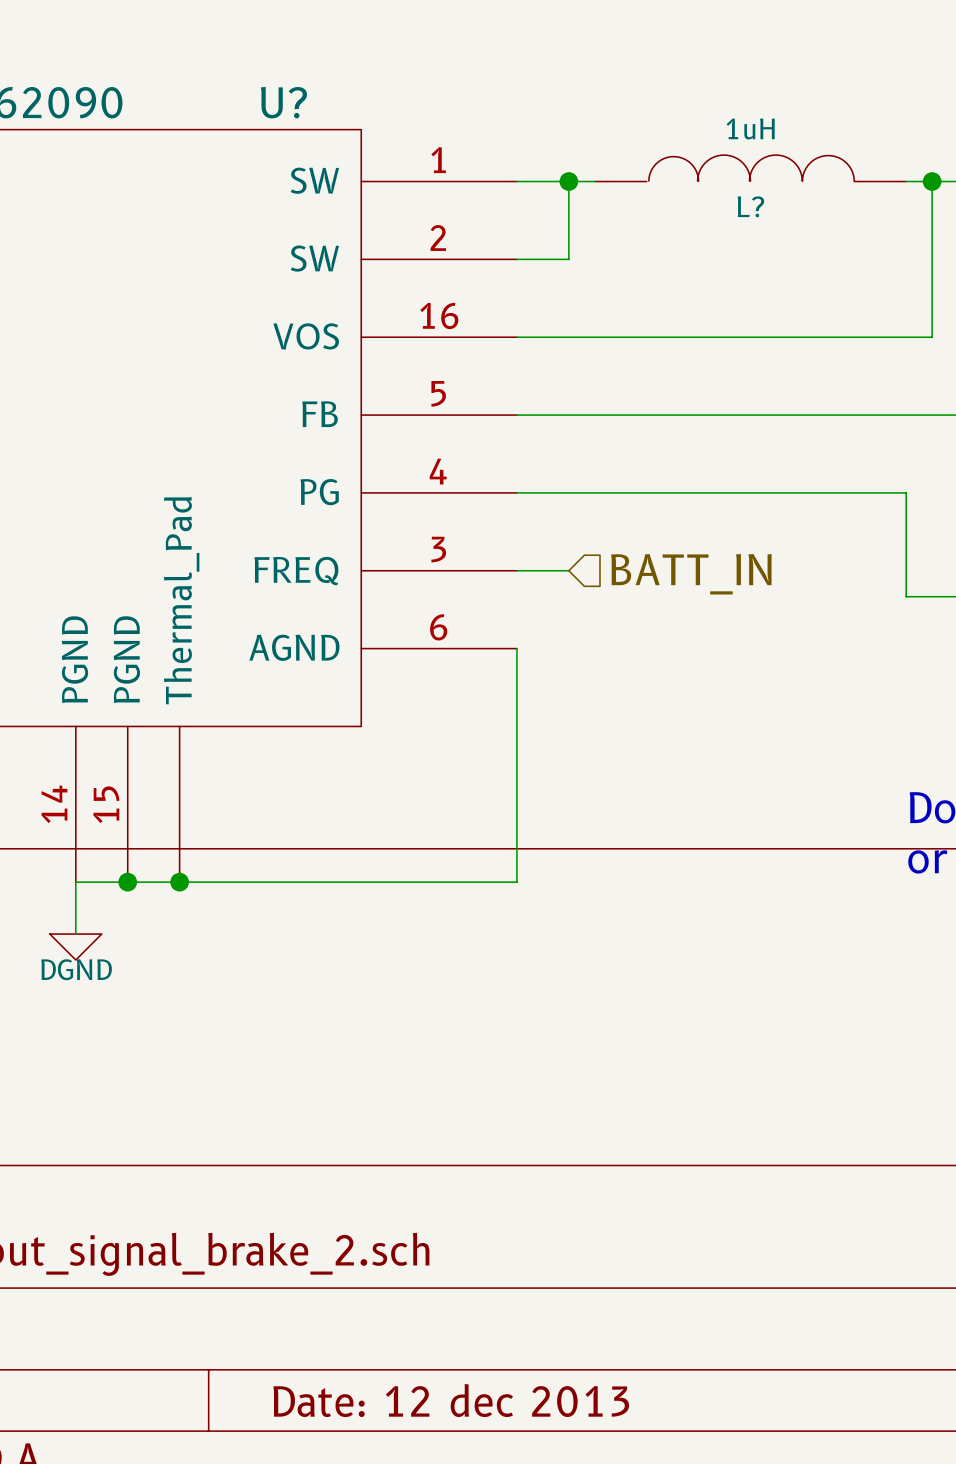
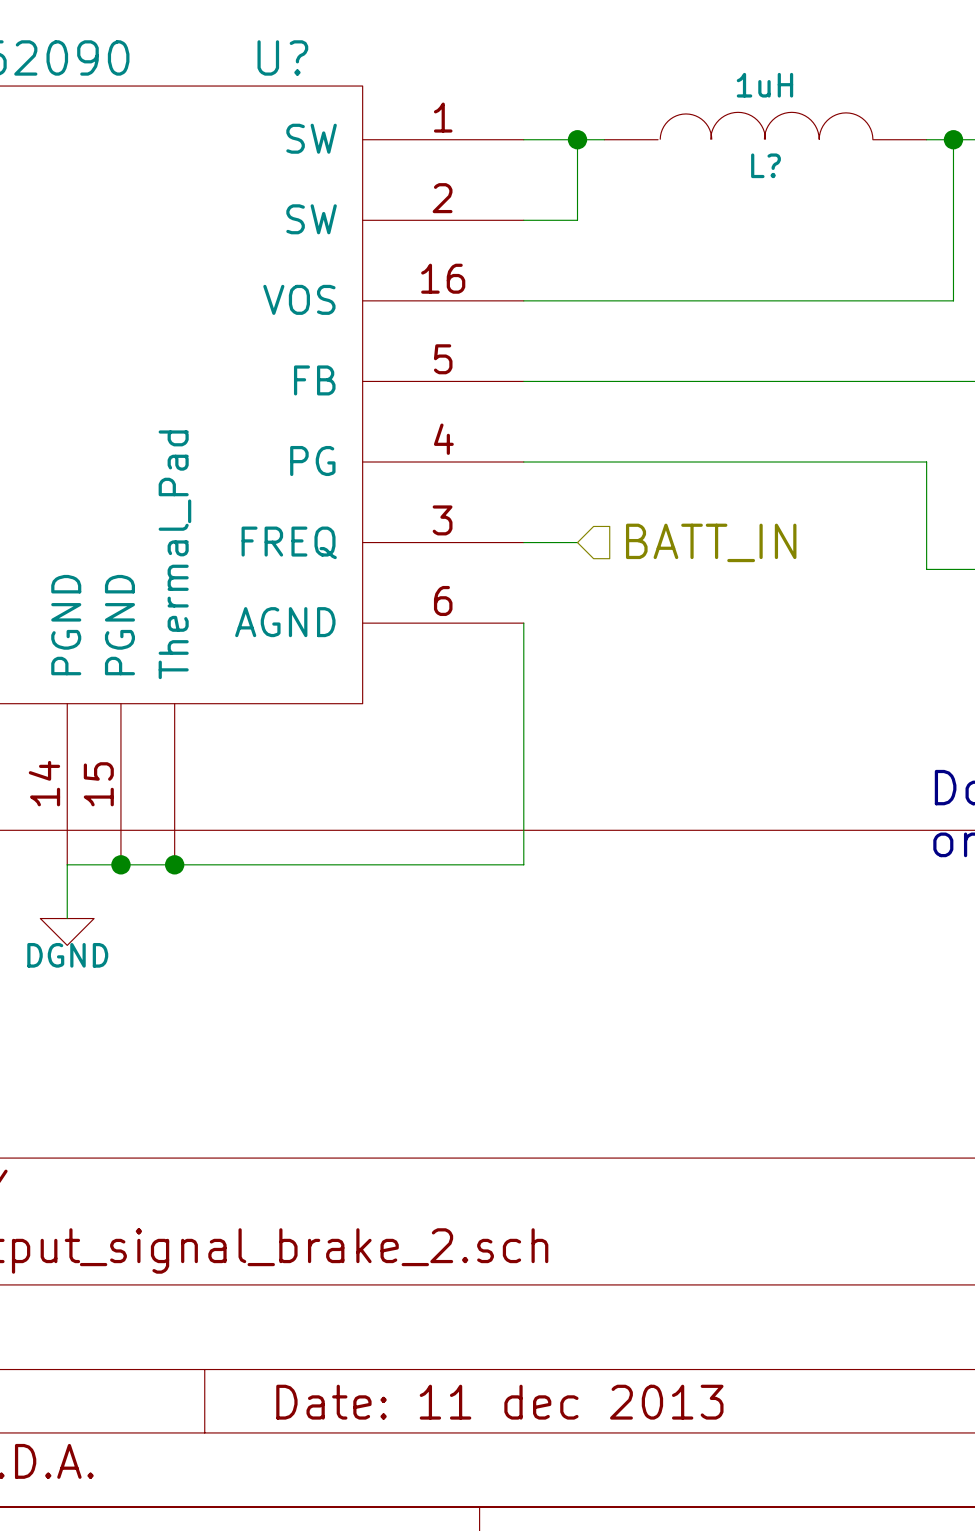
title block: Date: 12 dec 2013 (451, 1400) -> Date: 11 dec 2013 (499, 1402)

